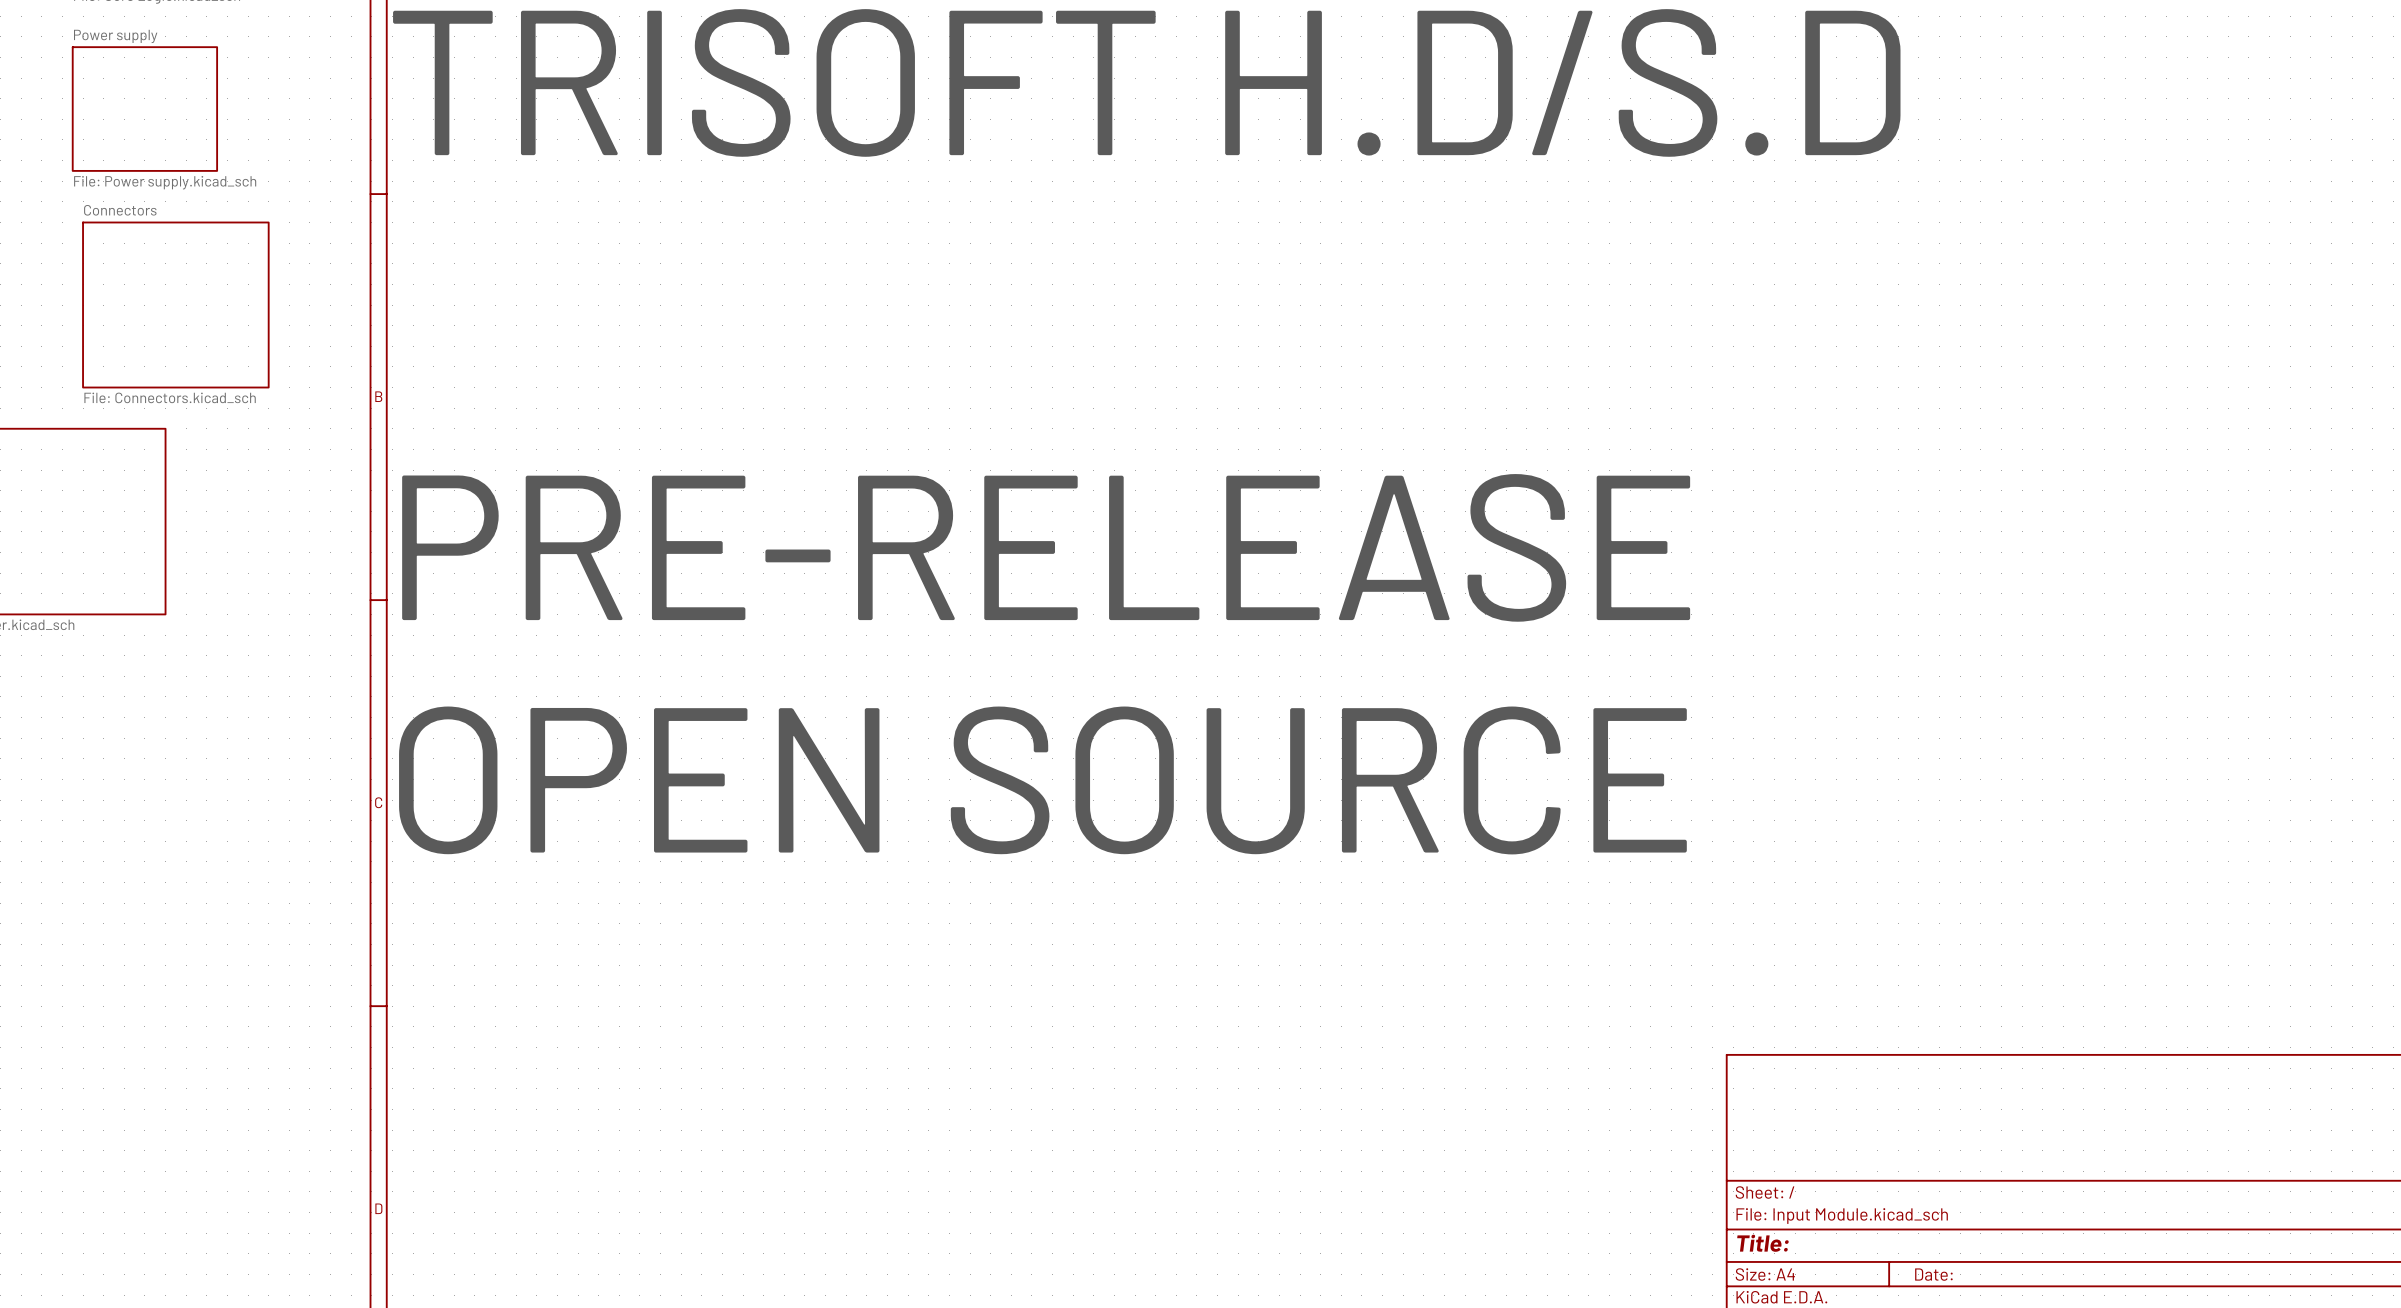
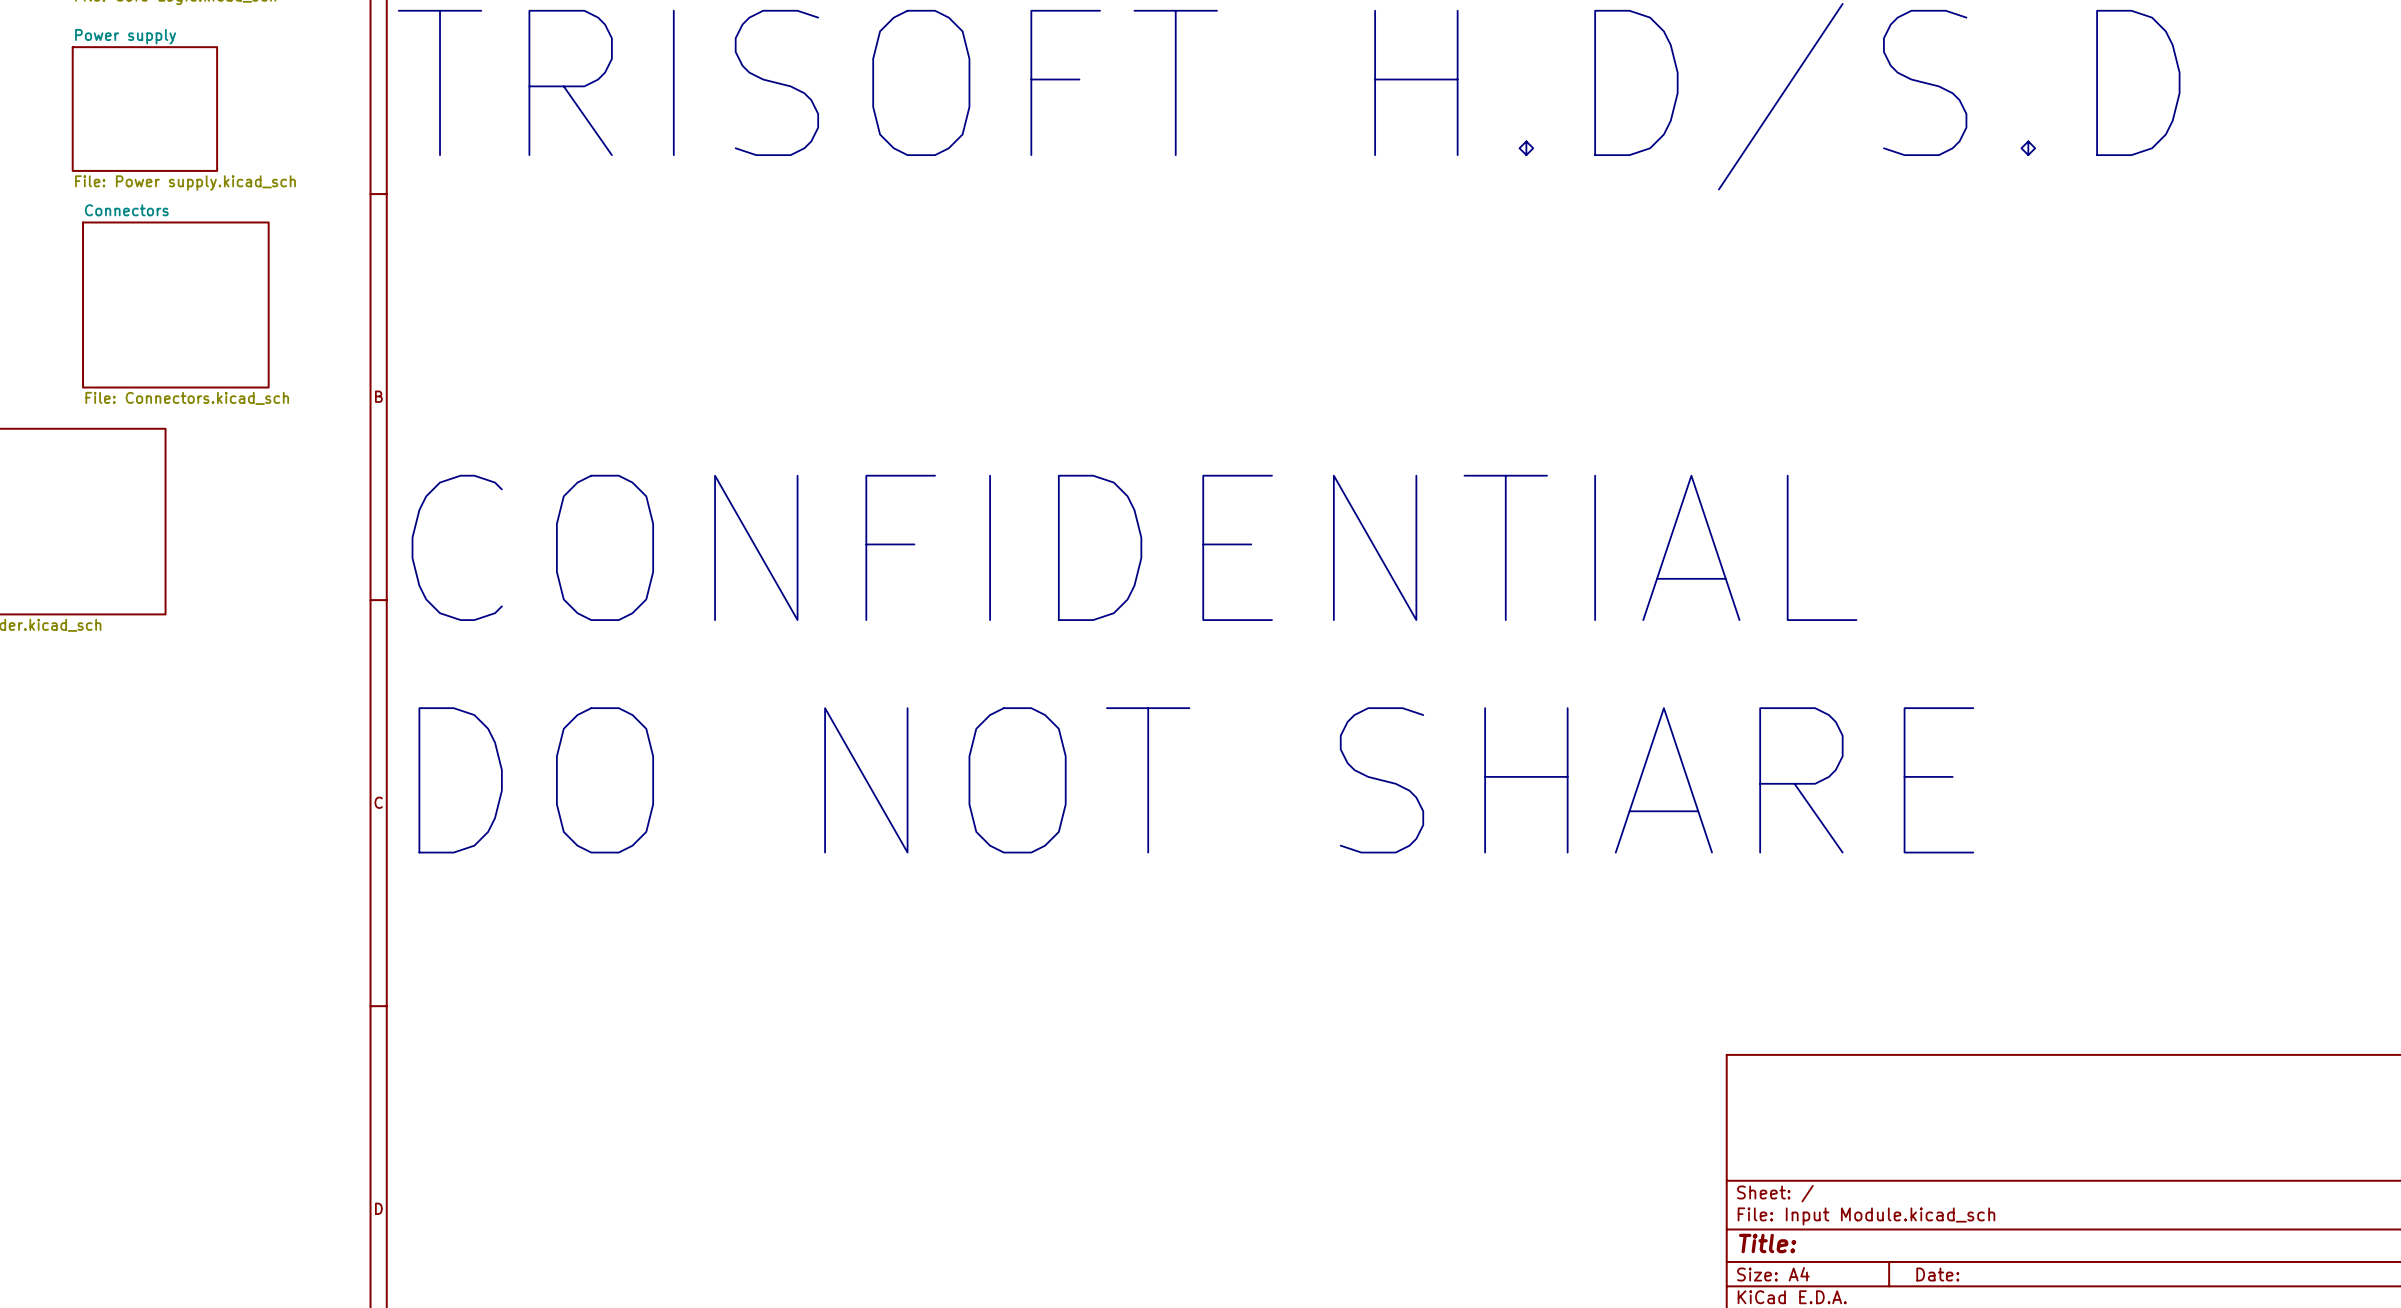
text: PRE-RELEASE (1046, 547) -> CONFIDENTIAL (1134, 547)
text: OPEN SOURCE (1042, 780) -> DO NOT SHARE (1196, 780)

